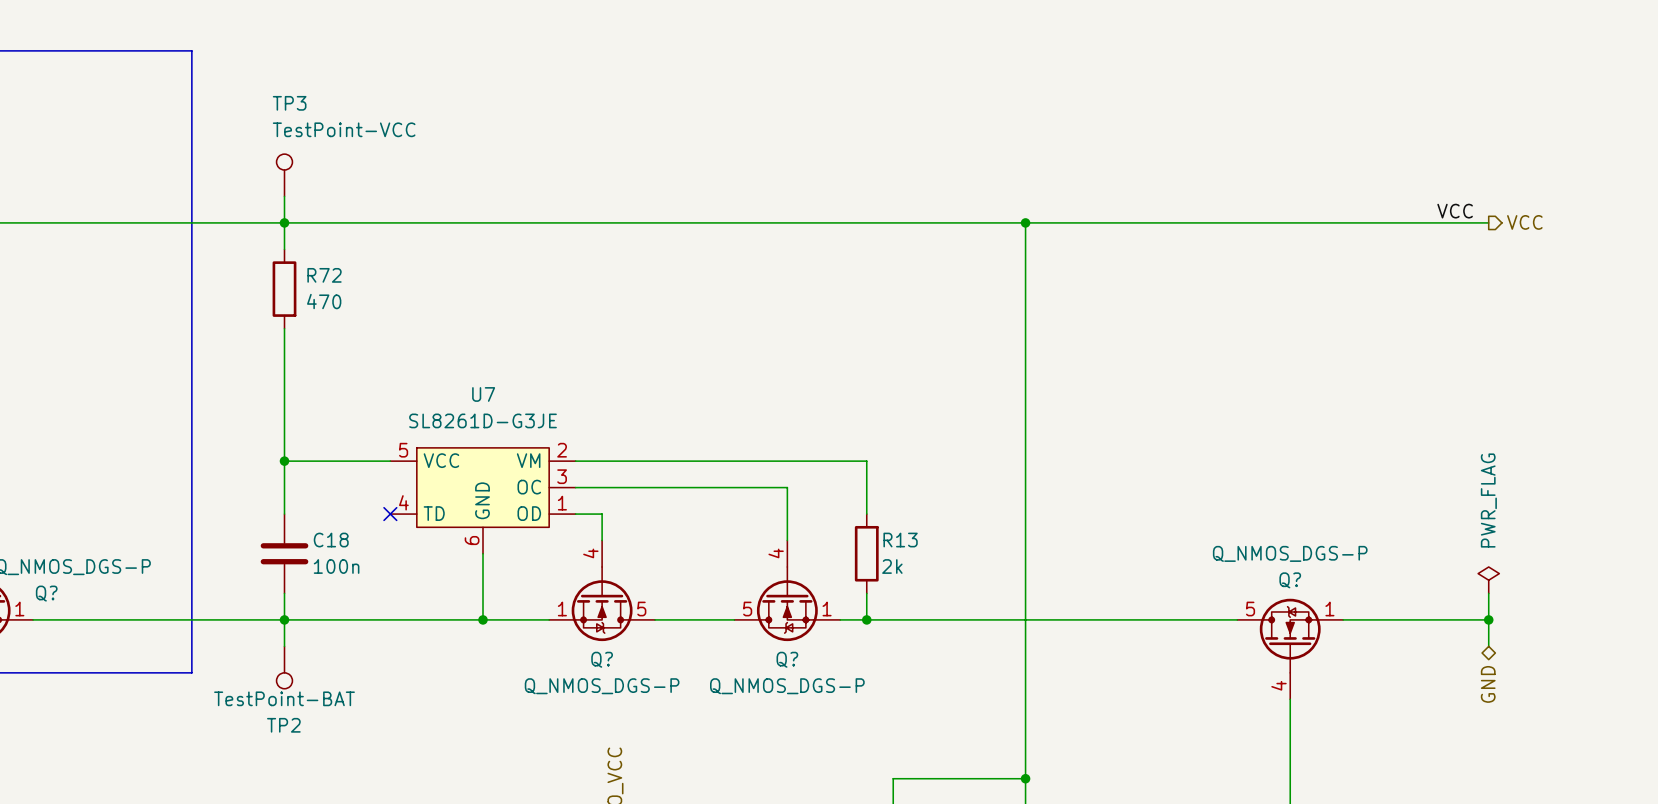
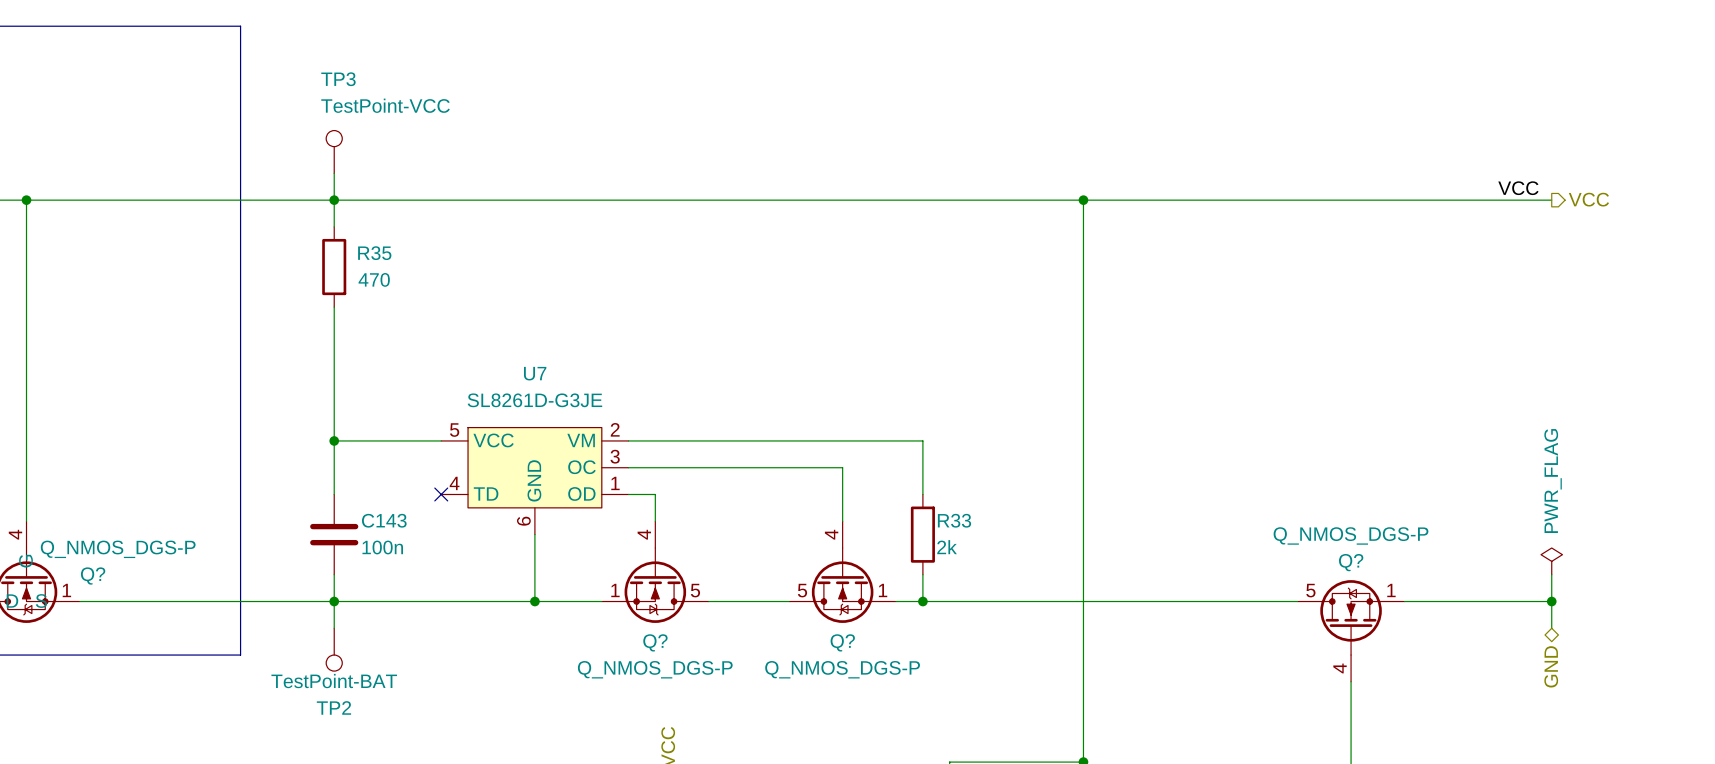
R72 name: R72 (324, 275) -> R35 (374, 253)
C18 name: C18 (331, 540) -> C143 (384, 520)
R13 name: R13 (900, 540) -> R33 (954, 520)

